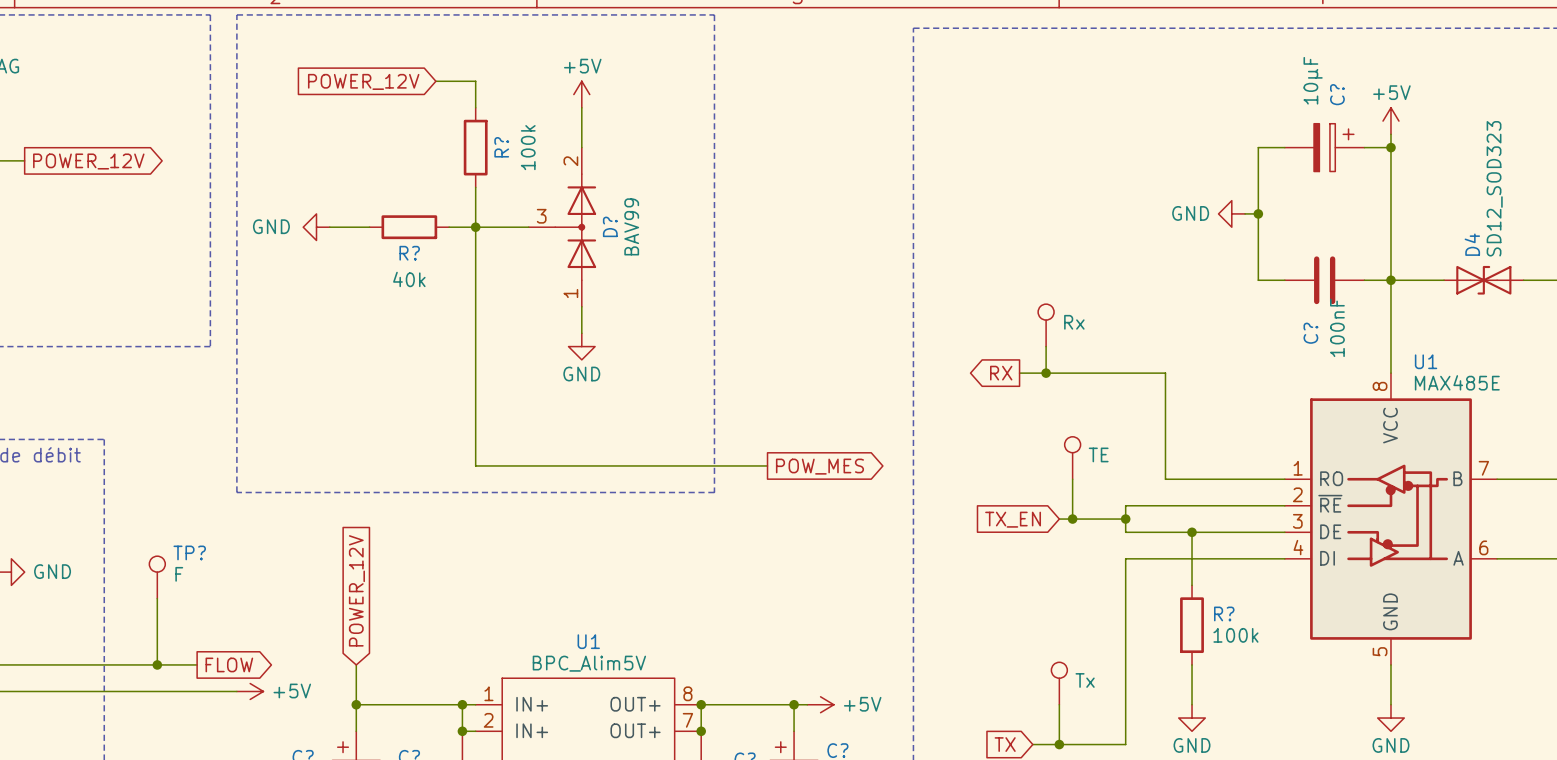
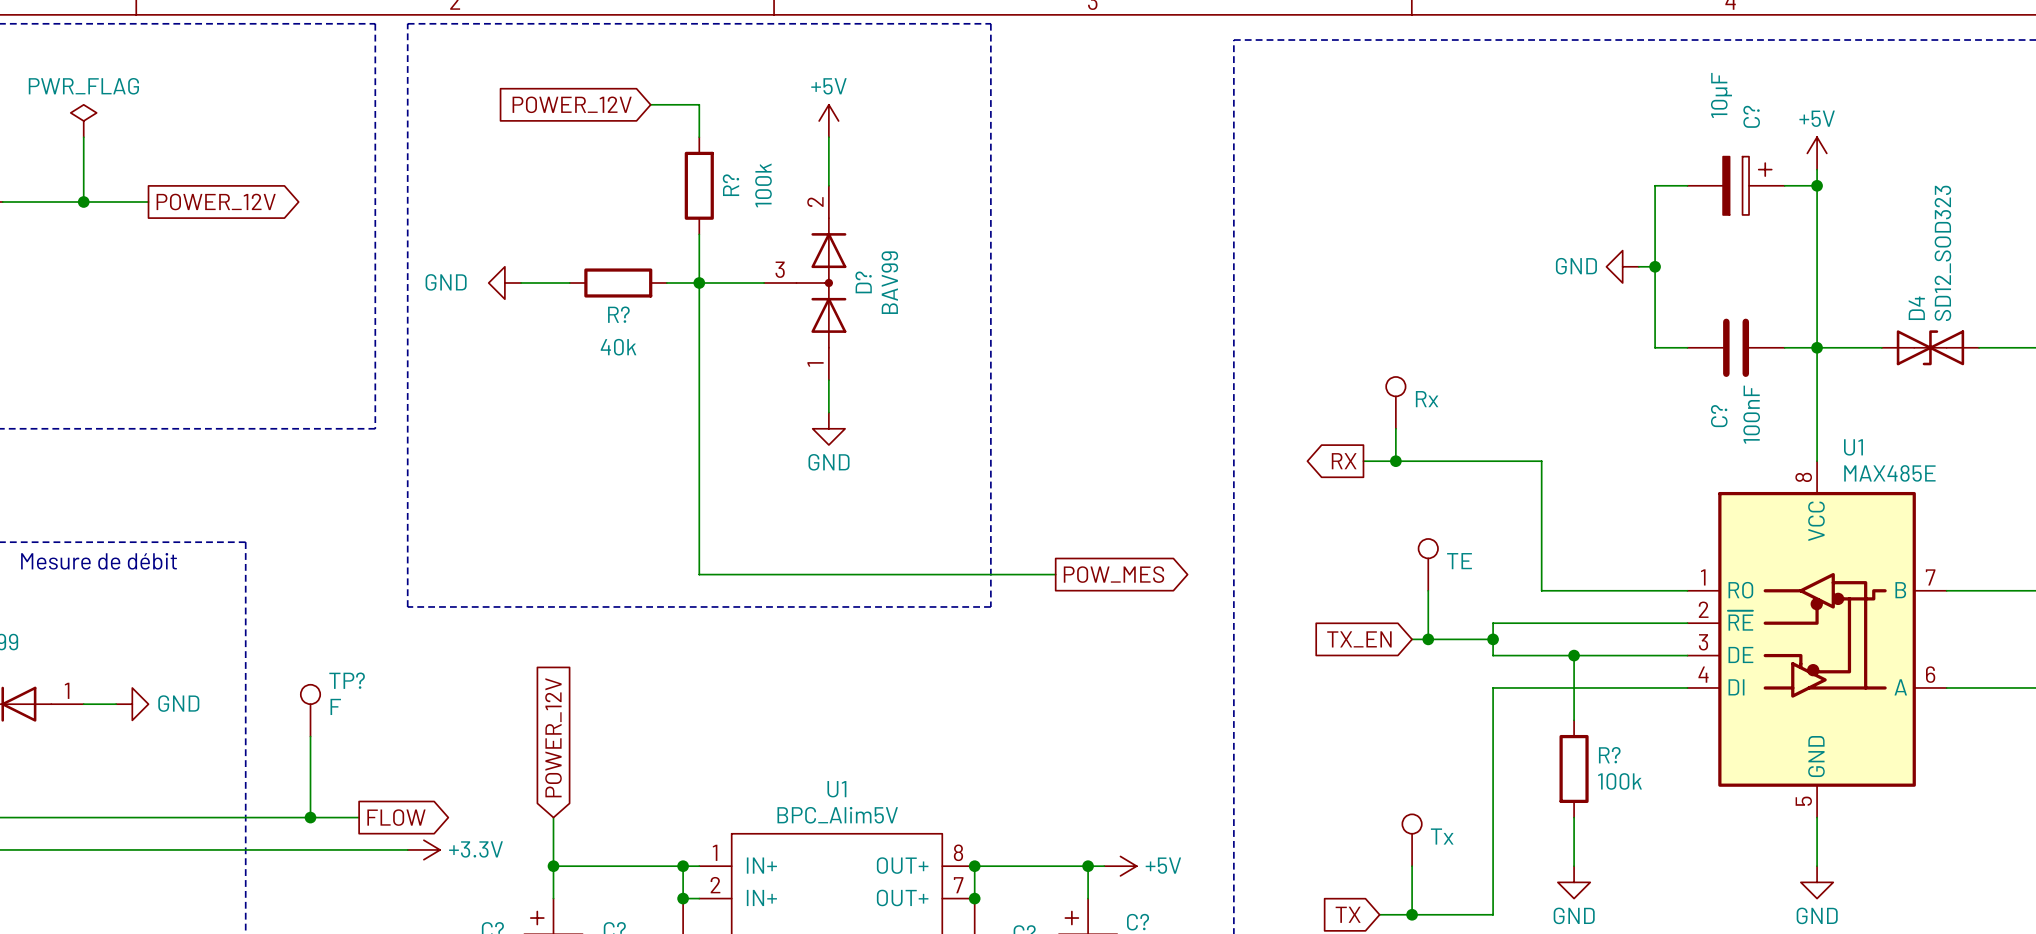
power symbol: +5V (250, 691) -> +3.3V (423, 849)

